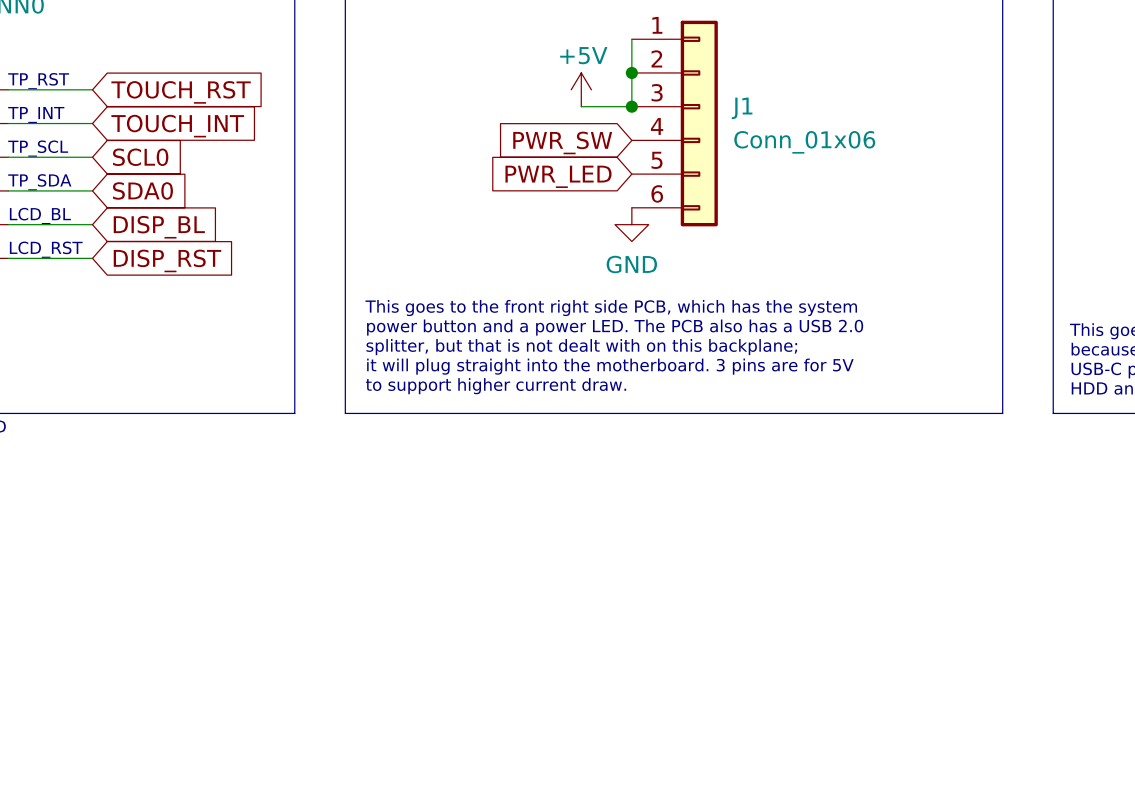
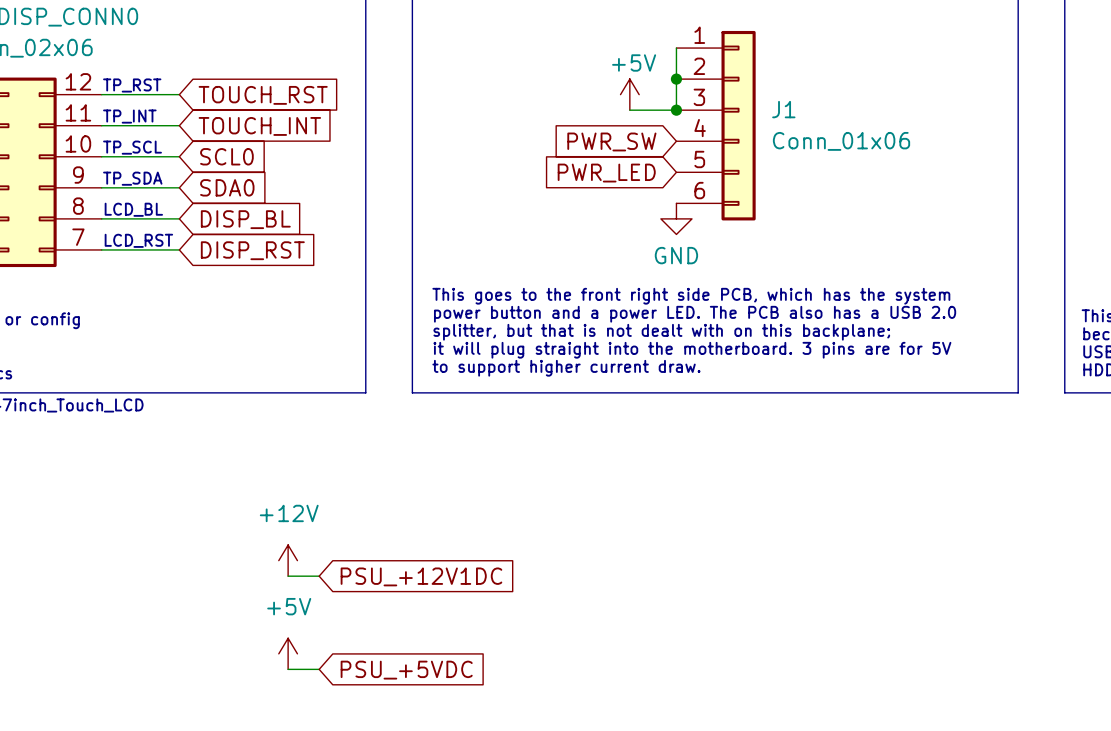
power symbol: none -> +12V (288, 560)
wire: none -> (288, 576) (319, 576)
global label: none -> PSU_+12V1DC (421, 576)
power symbol: none -> +5V (288, 653)
wire: none -> (288, 669) (319, 669)
global label: none -> PSU_+5VDC (406, 670)

